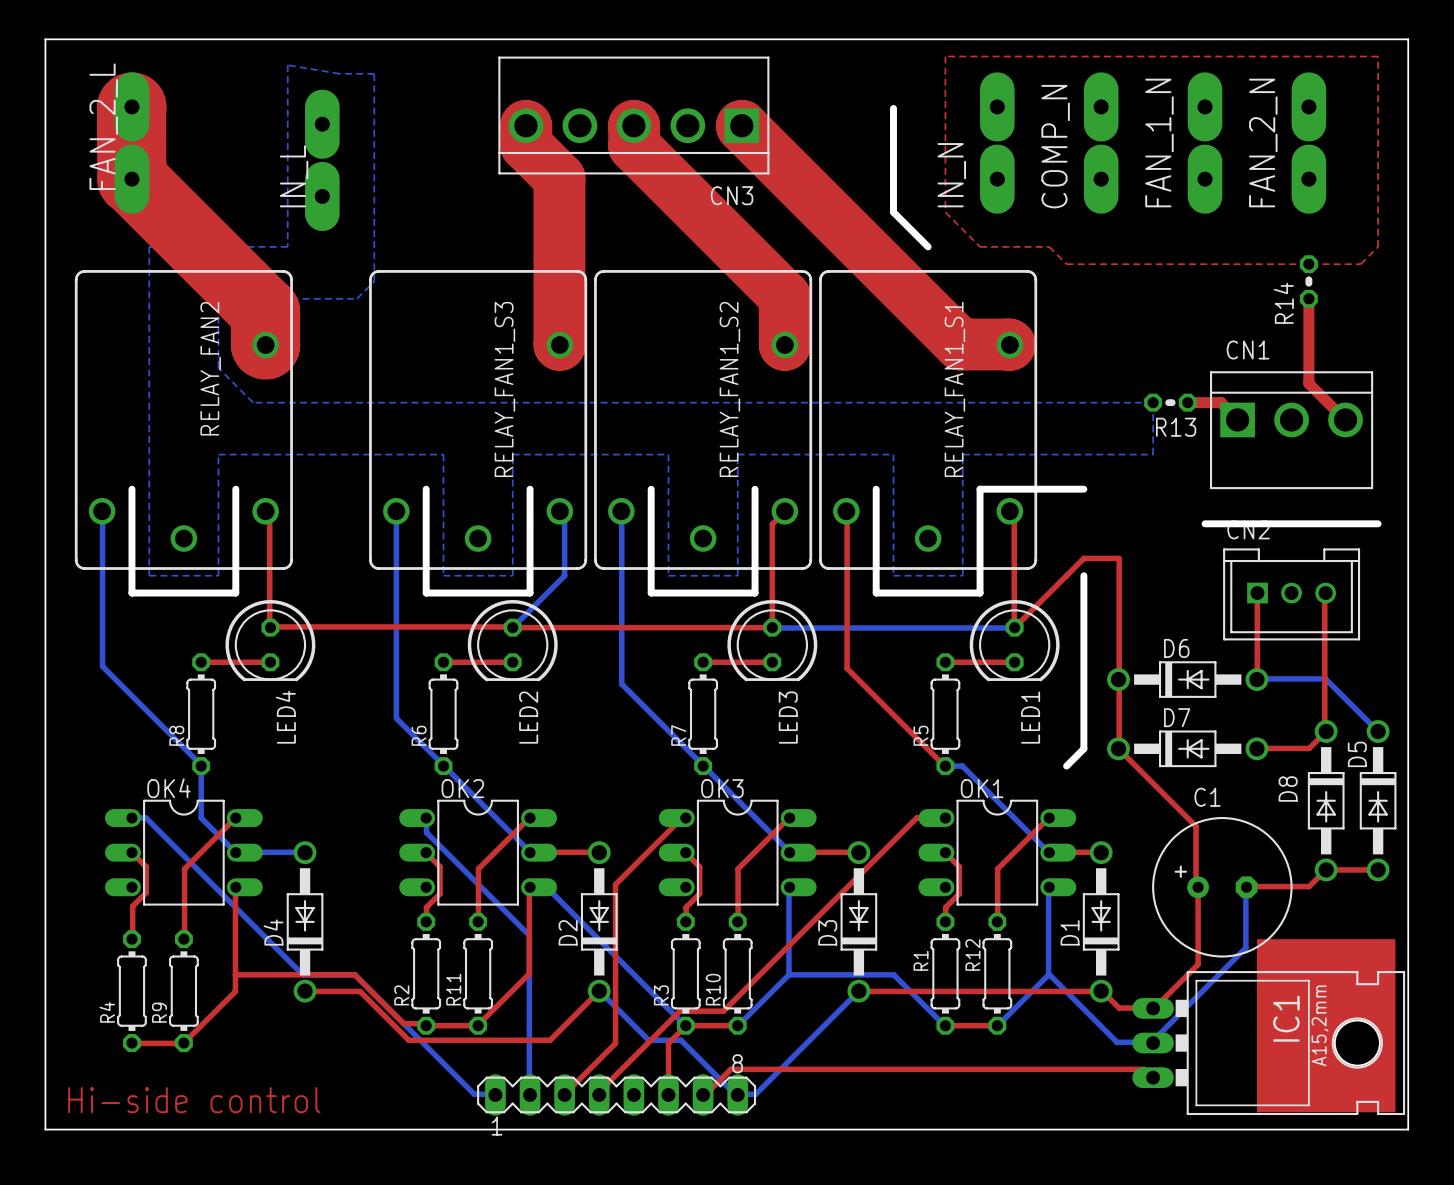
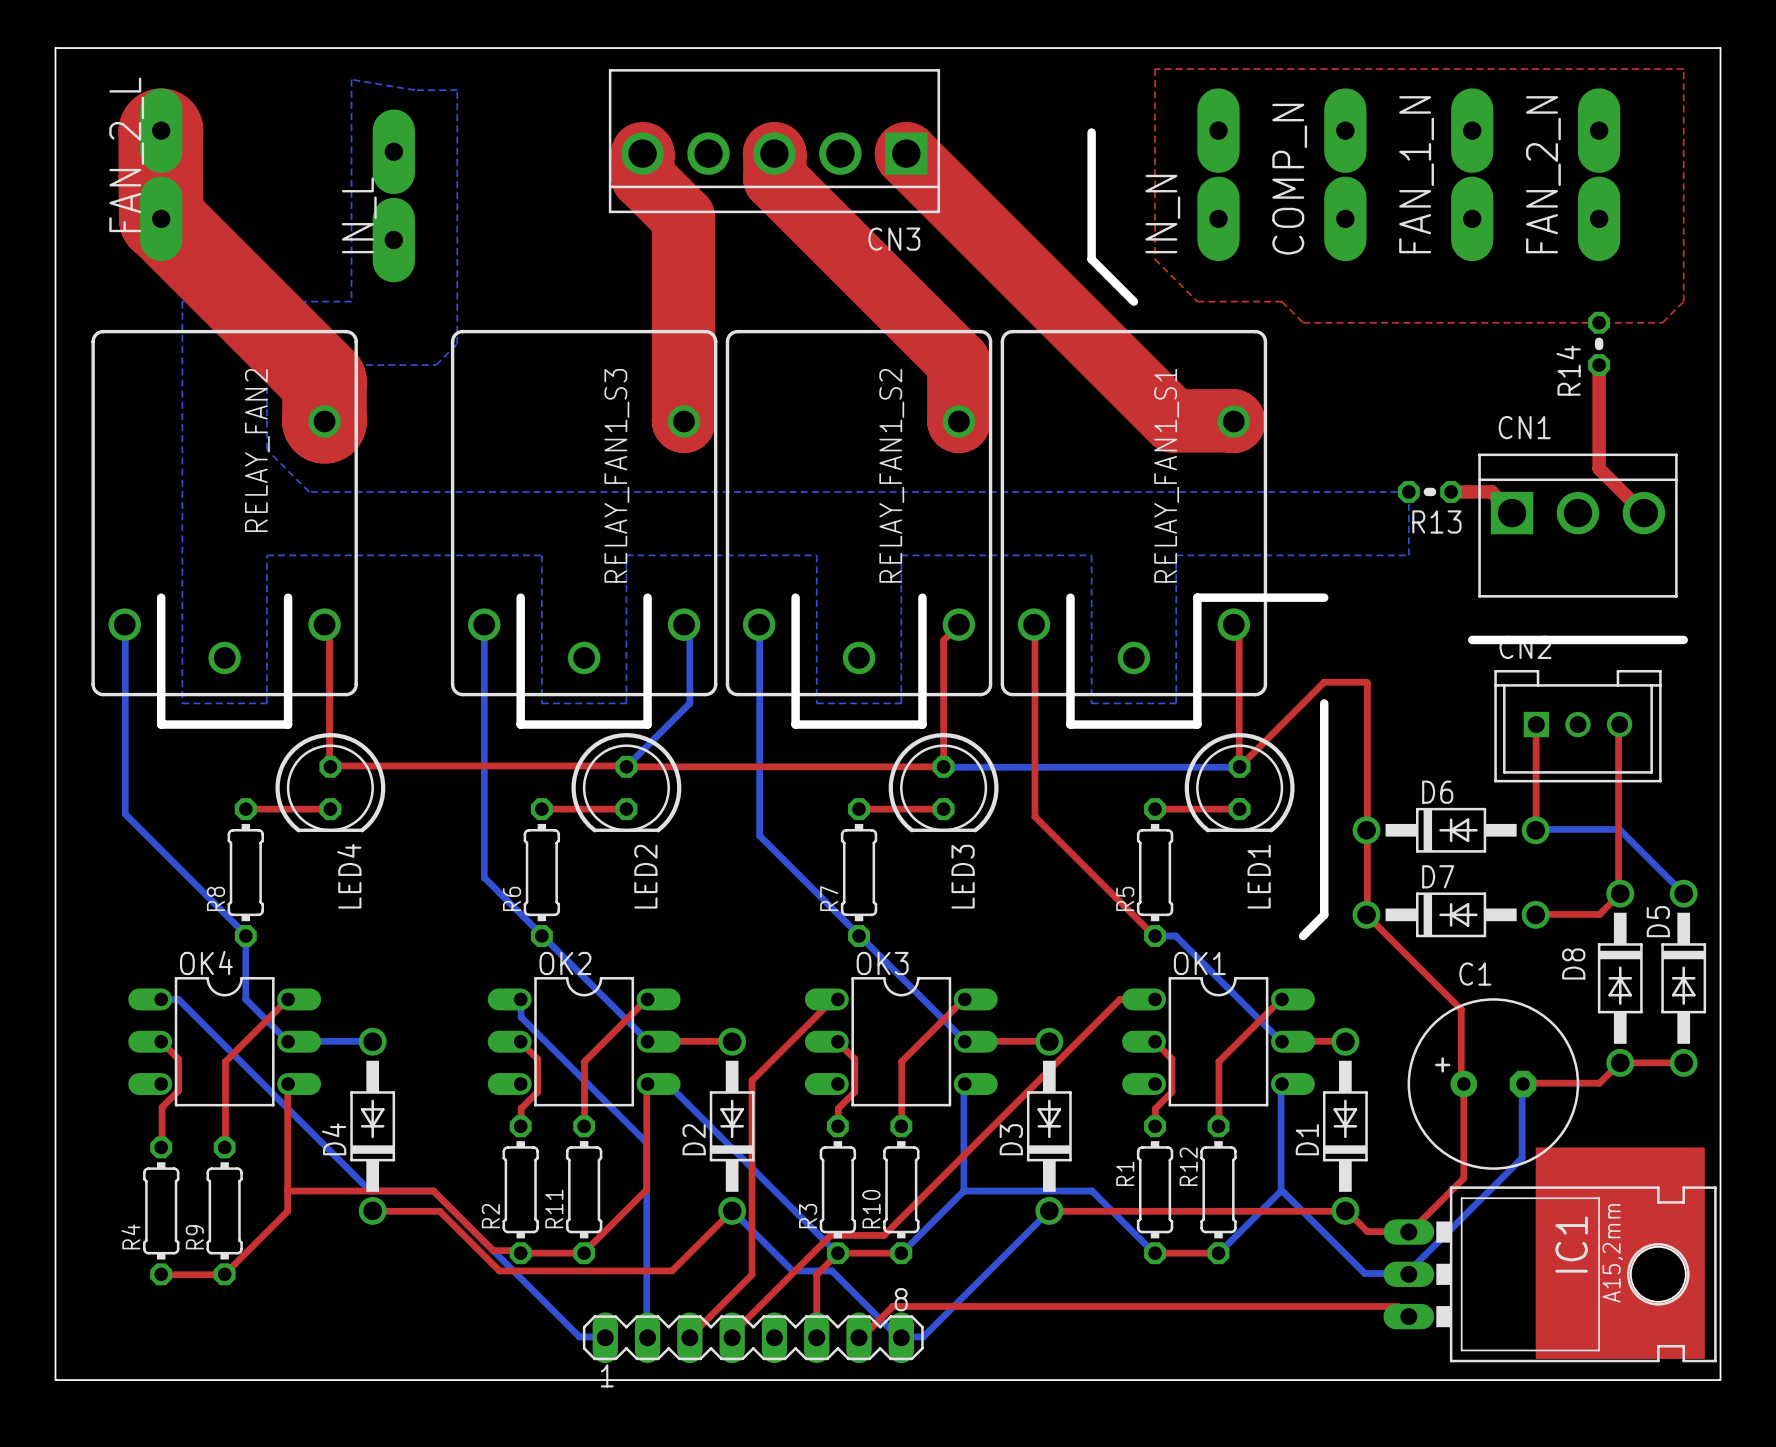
text: Hi-side control (194, 1100) -> none

